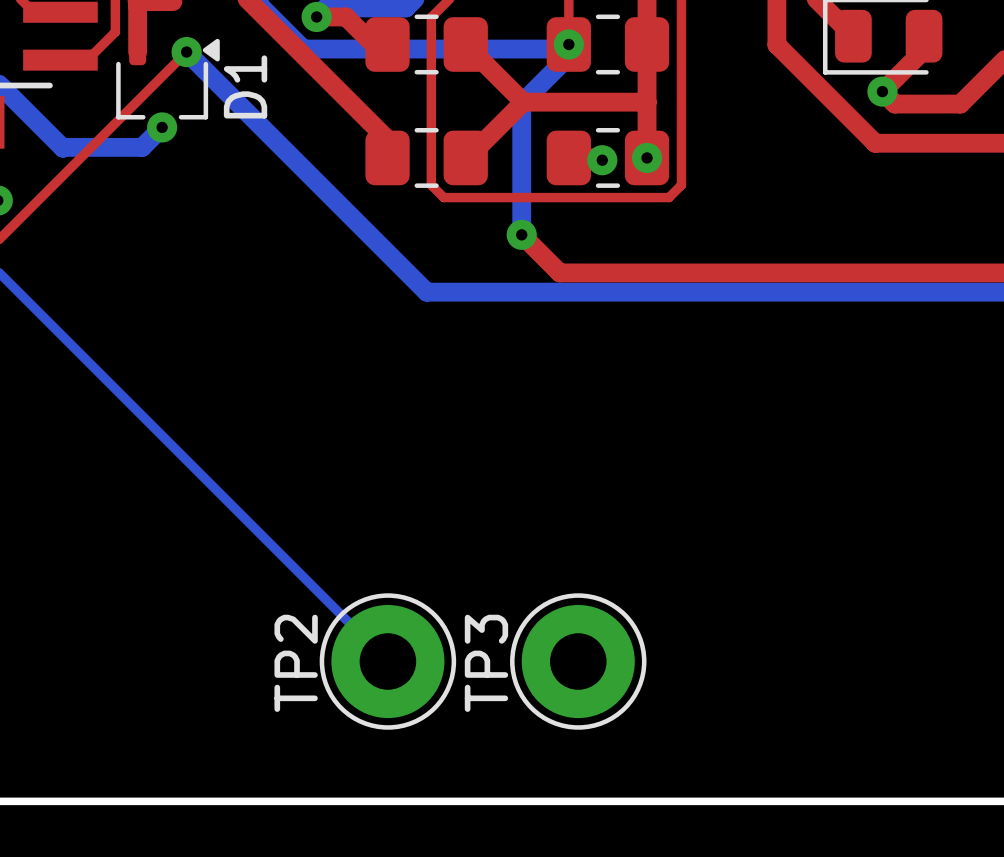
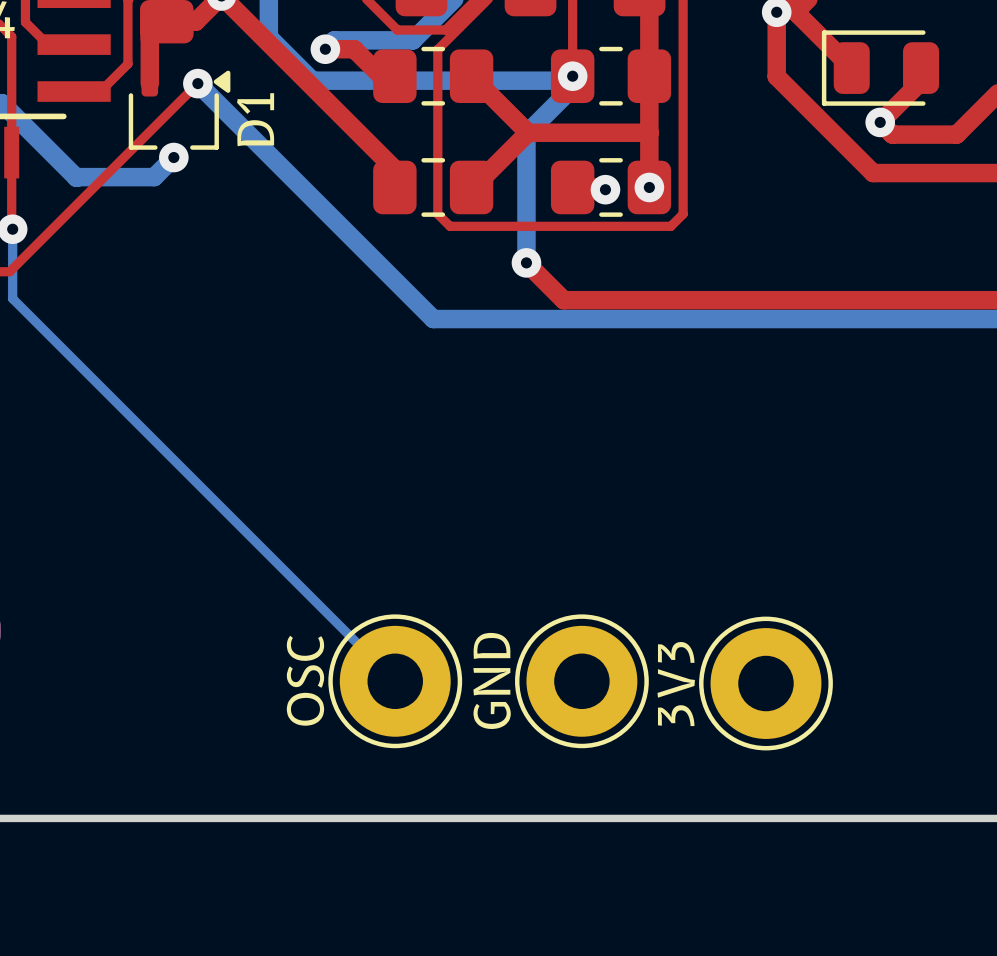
TP2 name: TP2 (296, 663) -> OSC (305, 680)
TP3 name: TP3 (486, 663) -> GND (492, 680)
3V3: none -> (765, 683)

